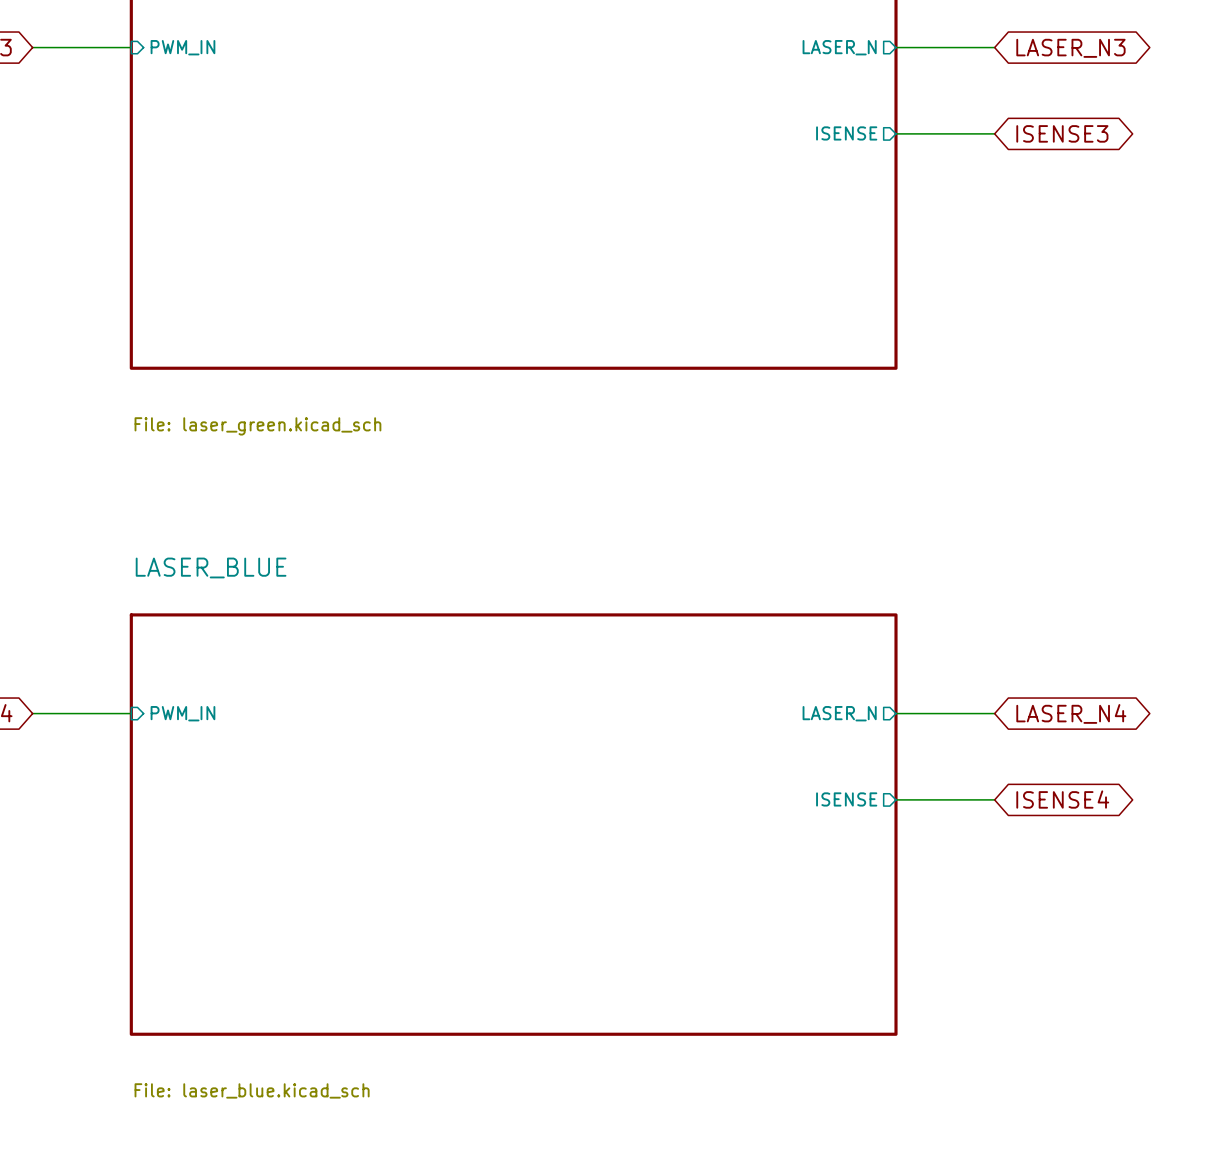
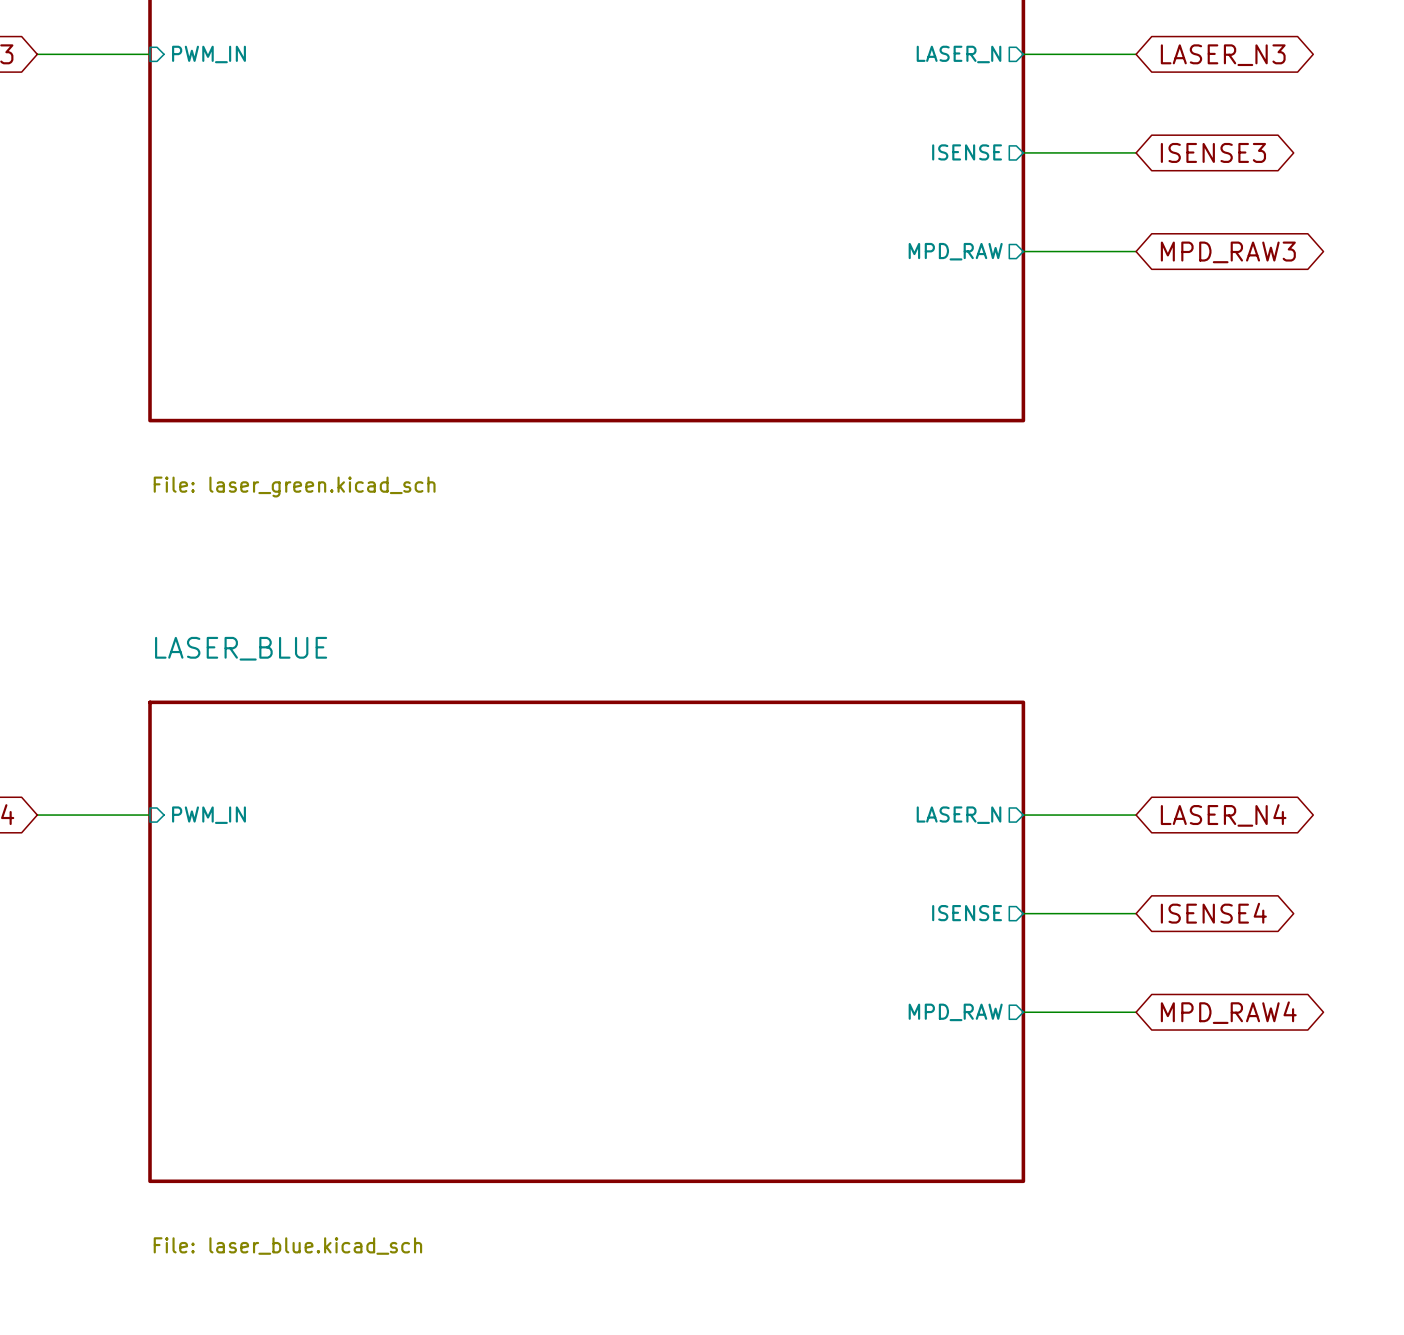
sheet pin: none -> MPD_RAW (955, 251)
wire: none -> (1023, 251) (1136, 251)
global label: none -> MPD_RAW3 (1228, 252)
sheet pin: none -> MPD_RAW (955, 1012)
wire: none -> (1023, 1012) (1136, 1012)
global label: none -> MPD_RAW4 (1228, 1012)

